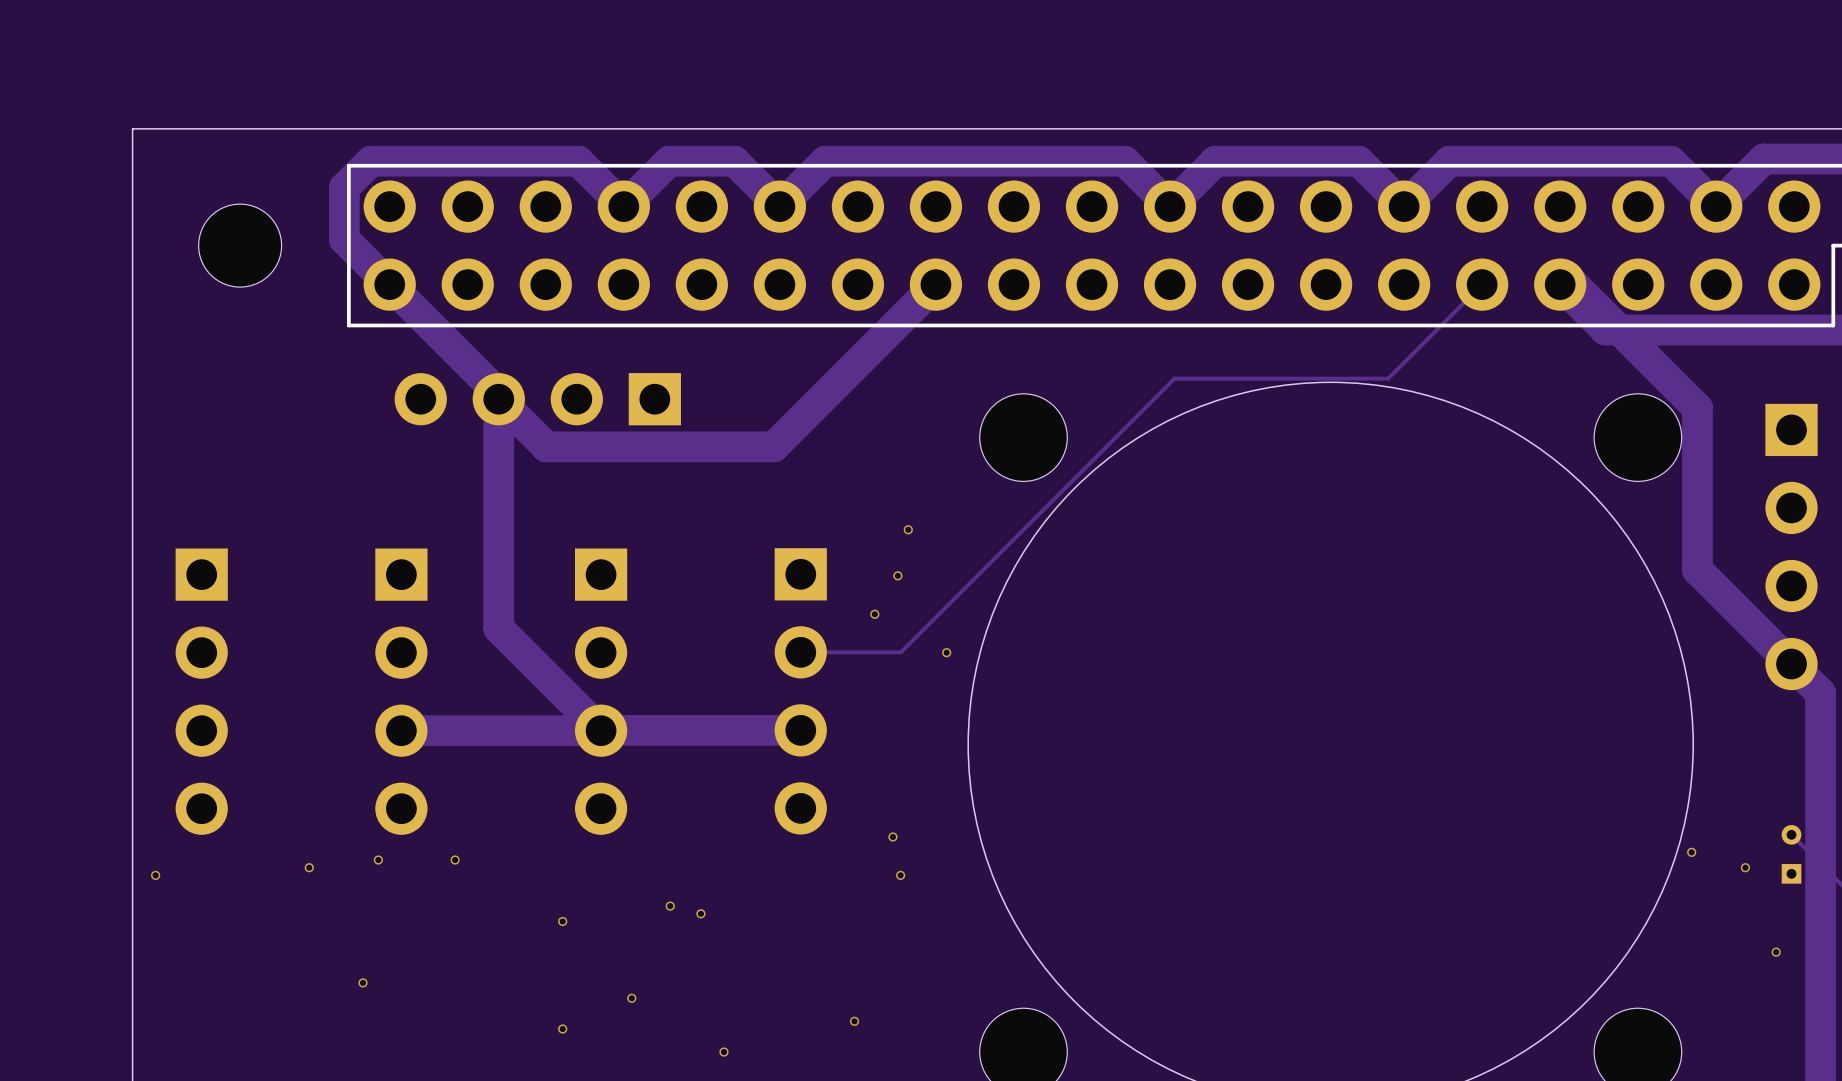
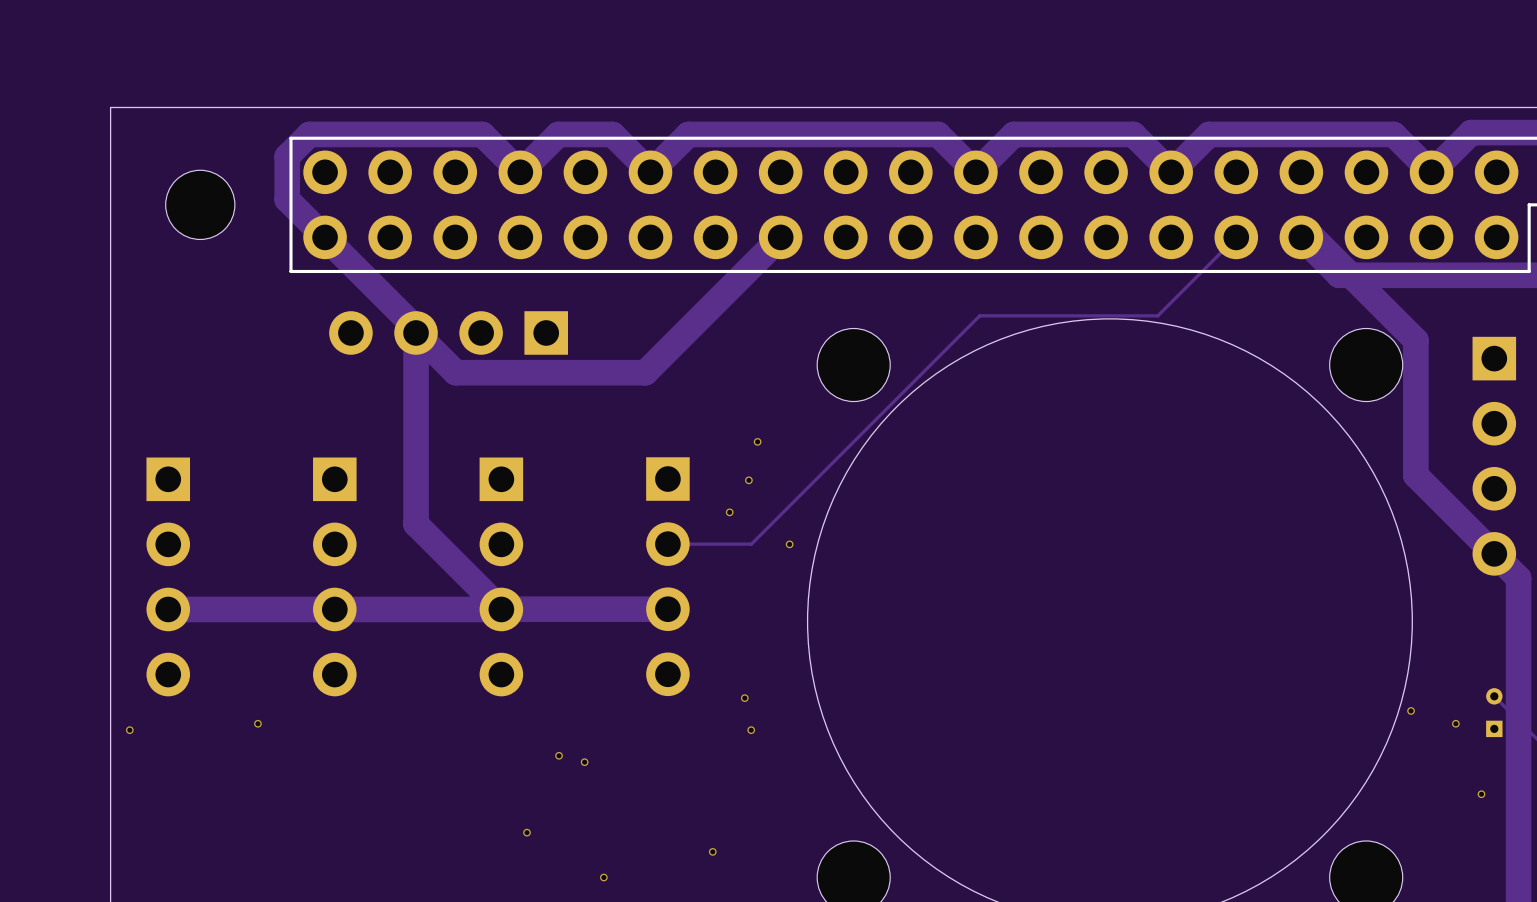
track: none -> (334, 609) (168, 609)
via: (378, 860) -> none
via: (455, 860) -> none
via: (562, 921) -> none
via: (363, 982) -> none
via: (562, 1028) -> none

